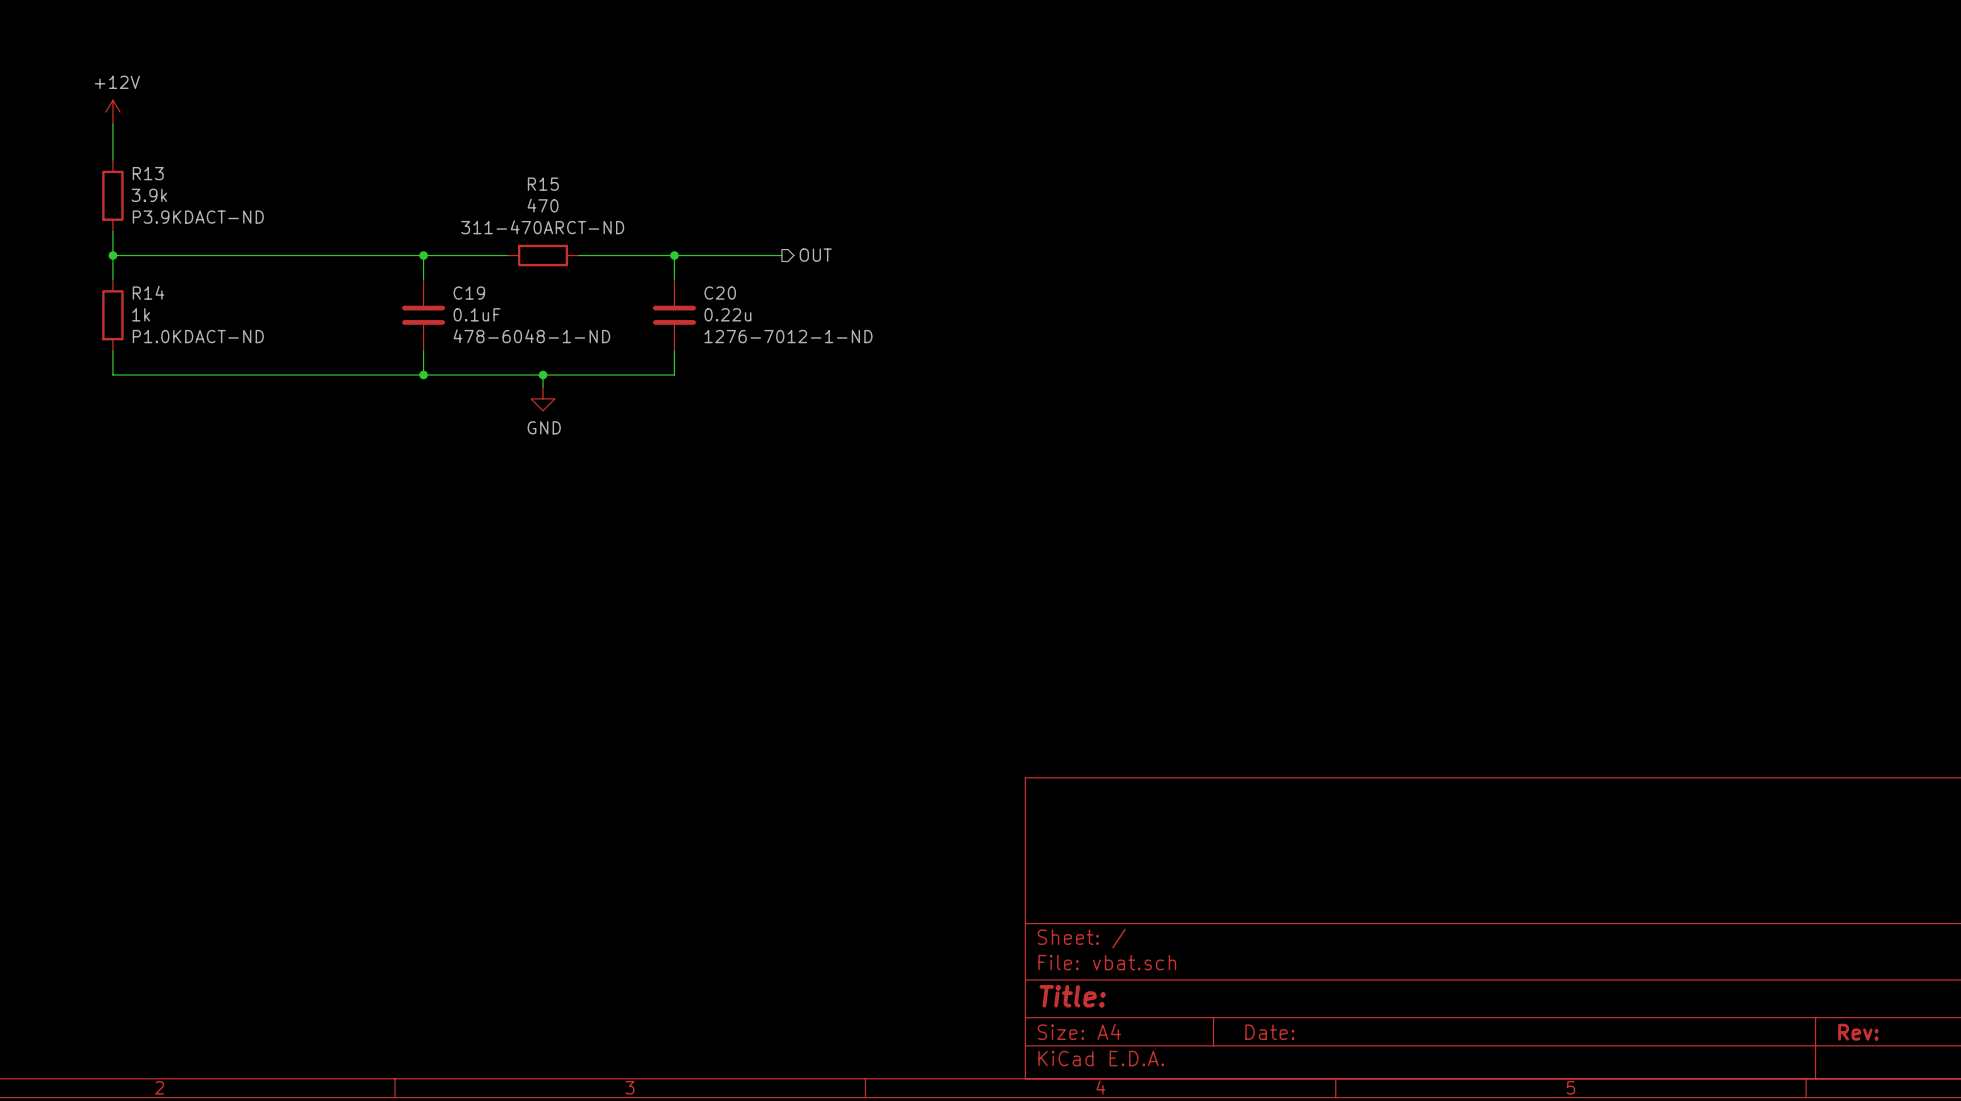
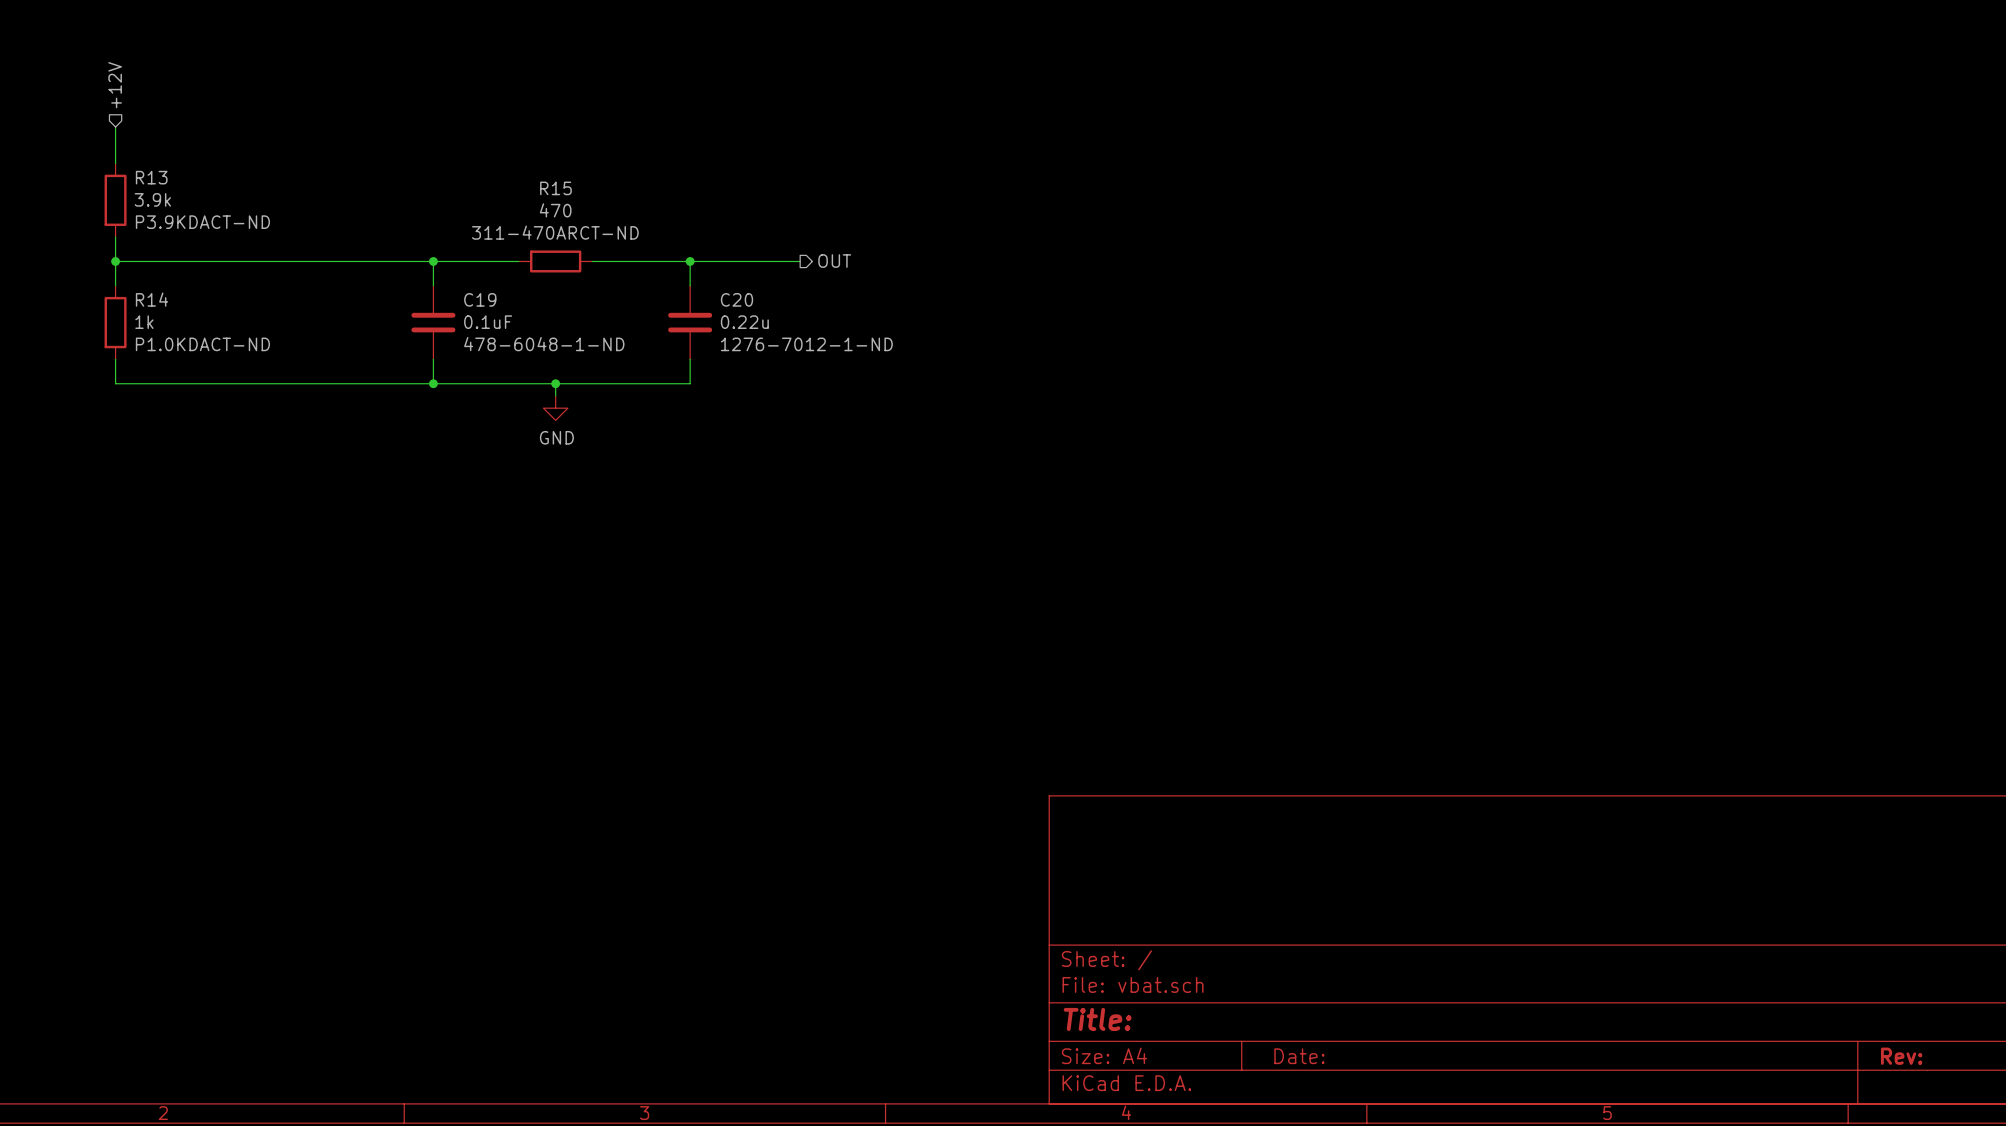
hierarchical label: none -> +12V (115, 85)
power symbol: +12V (112, 112) -> none

